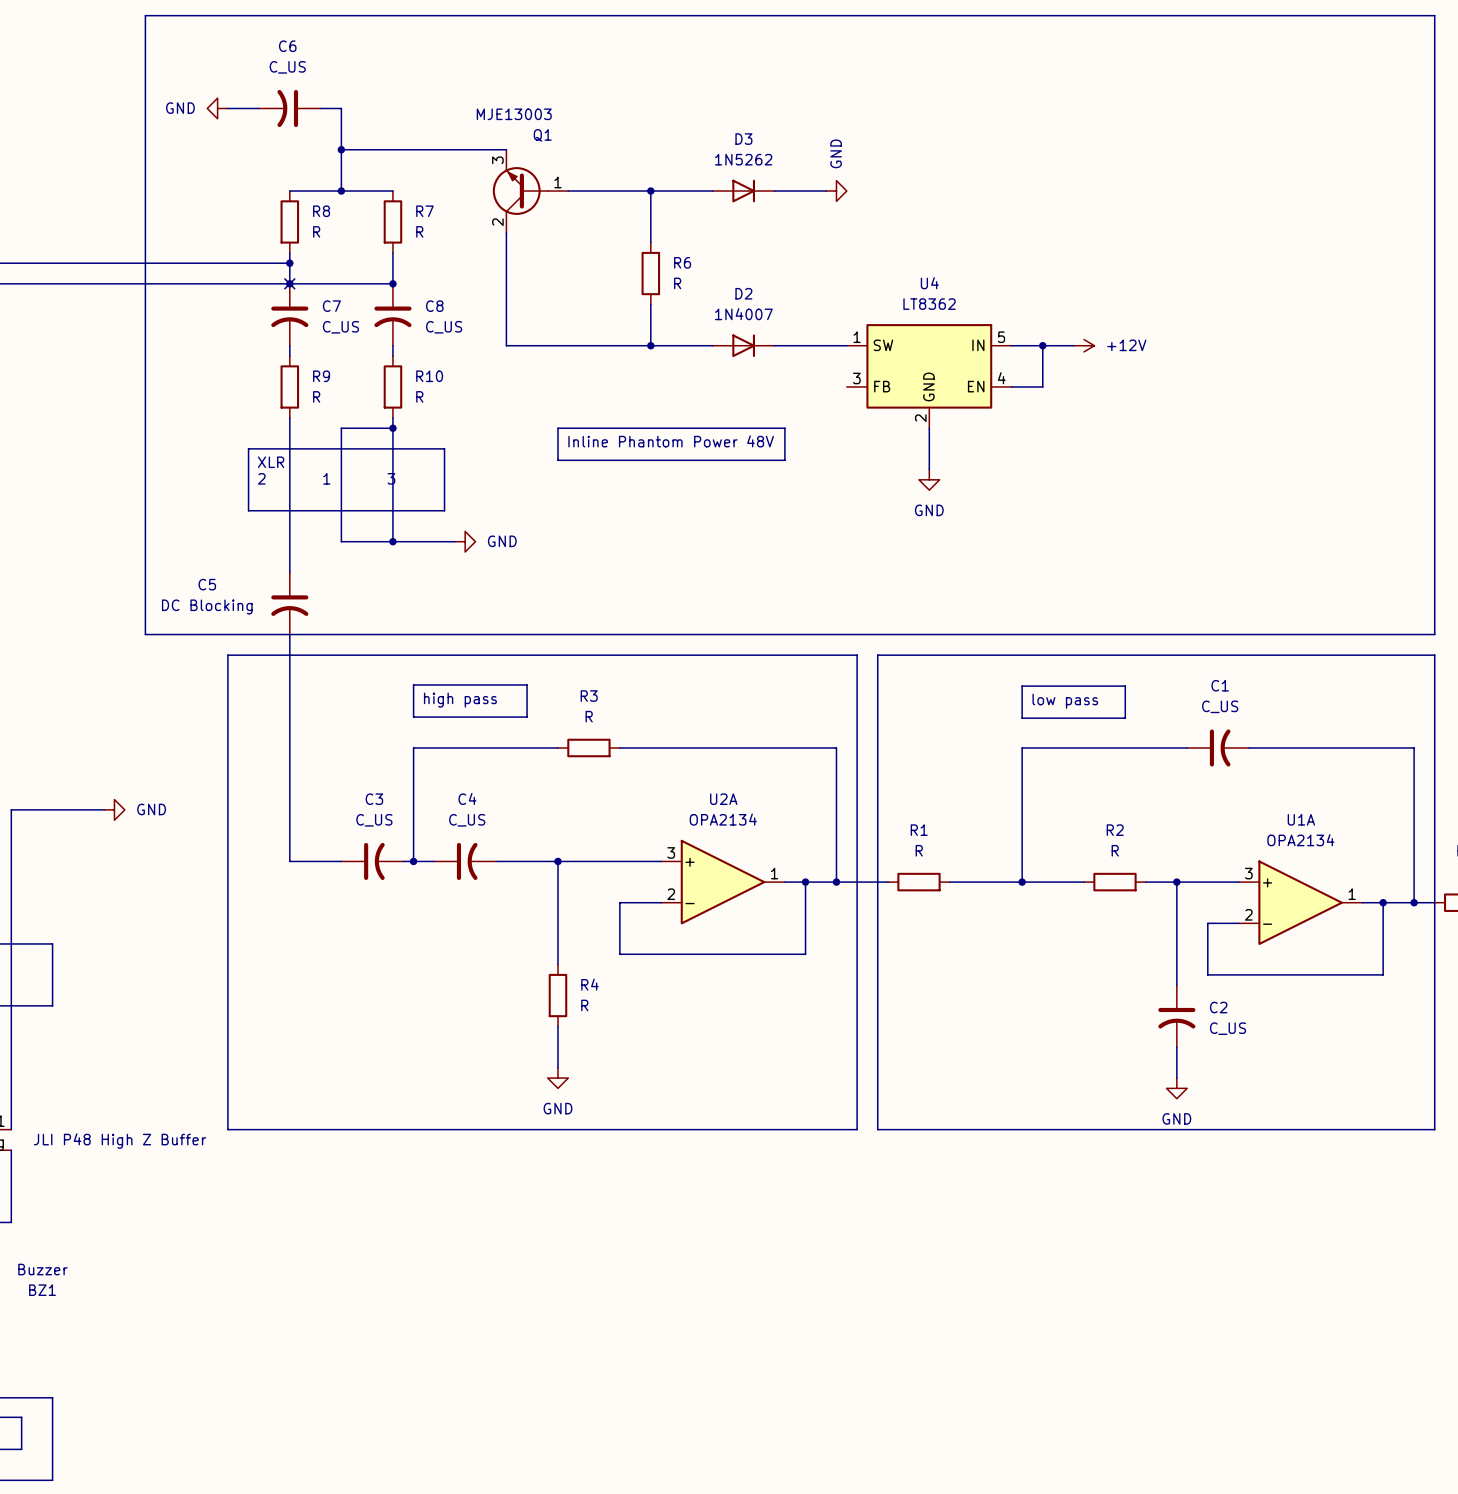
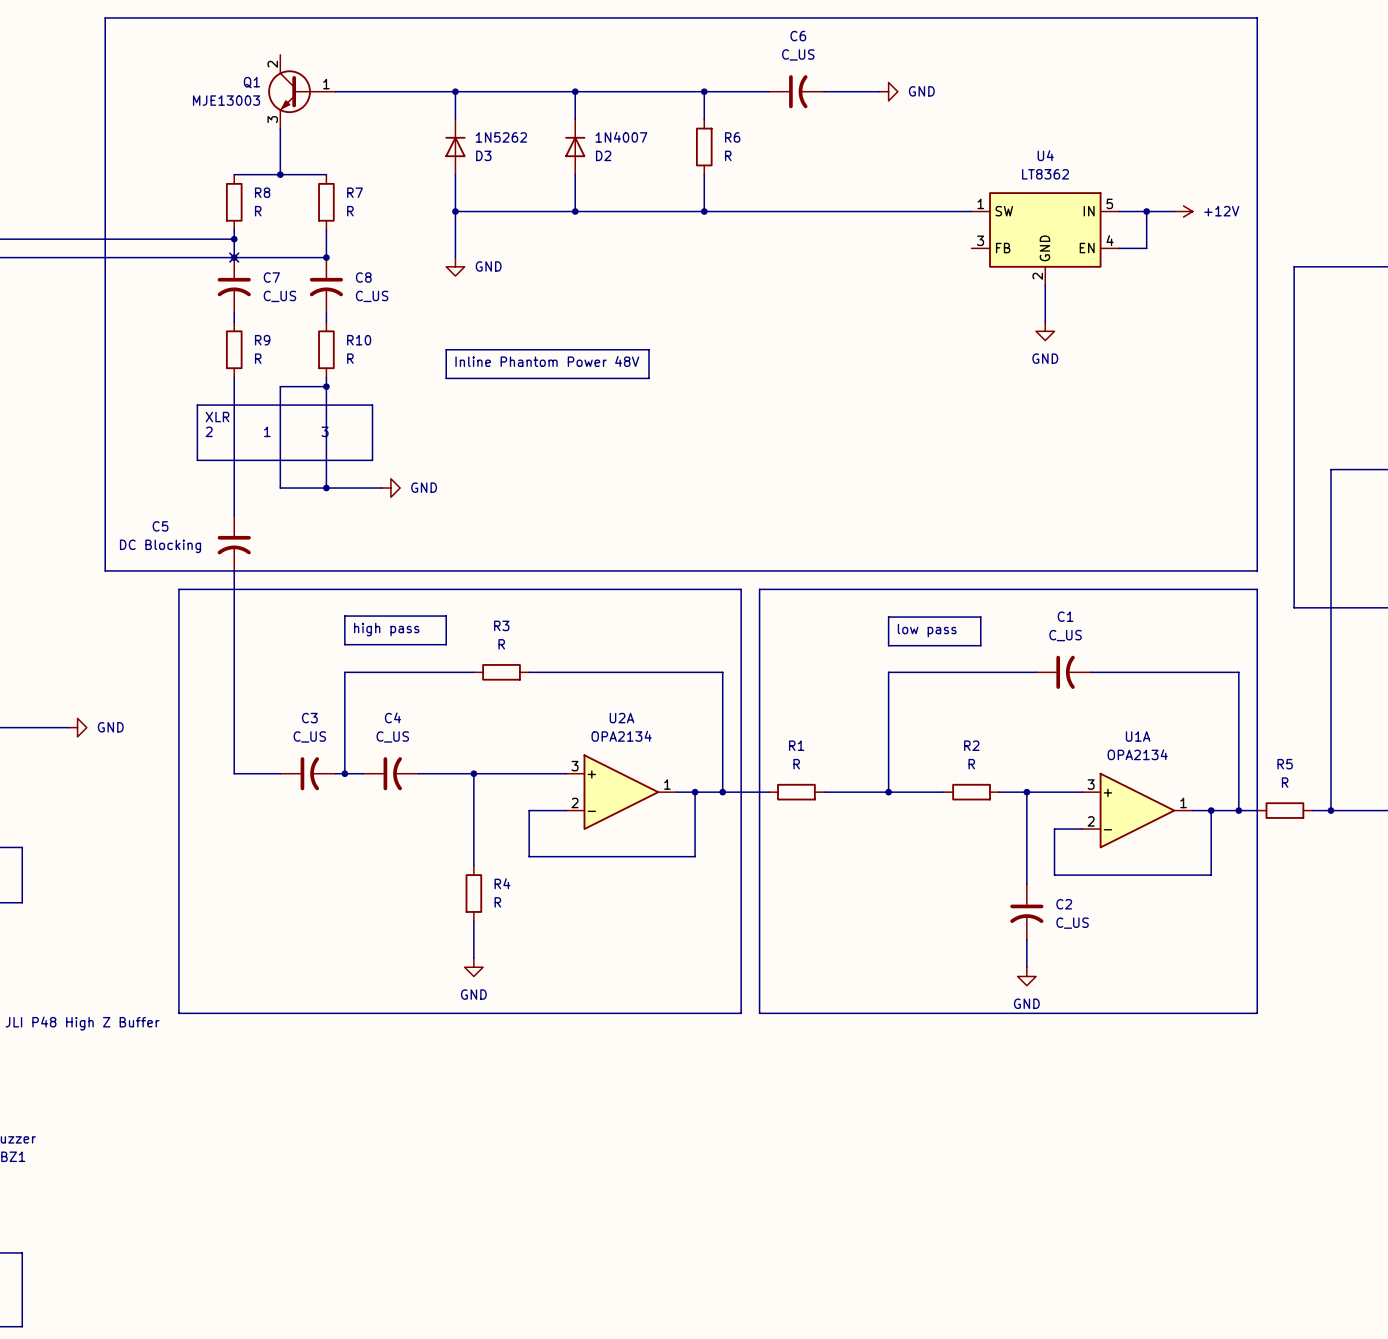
wire: none -> (335, 91) (768, 91)
wire: none -> (455, 91) (455, 119)
junction: none -> (455, 91)
wire: none -> (575, 91) (575, 119)
junction: none -> (575, 91)
wire: none -> (704, 91) (704, 119)
junction: none -> (704, 91)
wire: none -> (824, 91) (879, 91)
power symbol: none -> GND (888, 91)
power symbol: GND (217, 108) -> none
wire: (227, 108) (258, 108) -> none
C6 rotation: 0° (287, 108) -> 180° (798, 91)
C6 position: (289, 108) -> (796, 91)
wire: (320, 108) (341, 108) (341, 139) -> none
Q1 value position: MJE13003 (514, 114) -> MJE13003 (226, 100)
Q1 name position: Q1 (542, 135) -> Q1 (251, 82)
D3 name position: D3 (743, 139) -> D3 (483, 155)
wire: (341, 149) (506, 149) -> none
junction: (341, 149) -> none
D3 value position: 1N5262 (743, 159) -> 1N5262 (501, 137)
Q1 flip: as is (520, 191) -> up-down (292, 91)
Q1 position: (530, 191) -> (301, 91)
wire: none -> (455, 174) (455, 257)
wire: (568, 191) (712, 191) -> none
wire: (650, 191) (650, 242) -> none
junction position: (650, 191) -> (575, 211)
D3 rotation: 0° (743, 191) -> 90° counterclockwise (455, 147)
D3 position: (743, 191) -> (455, 147)
wire: (774, 191) (826, 191) -> none
wire: none -> (704, 174) (704, 211)
power symbol: GND (836, 191) -> none
wire: (506, 232) (506, 345) (712, 345) -> none
wire: none -> (455, 211) (971, 211)
junction: none -> (455, 211)
junction: none -> (704, 211)
wire: none -> (1119, 211) (1174, 211)
wire: none -> (1146, 211) (1146, 248) (1119, 248)
junction: none -> (1146, 211)
power symbol: none -> +12V (1183, 211)
R6 position: (650, 273) -> (704, 147)
D2 name position: D2 (743, 293) -> D2 (603, 155)
power symbol: none -> GND (455, 266)
wire: (650, 304) (650, 345) -> (575, 174) (575, 211)
D2 value position: 1N4007 (743, 314) -> 1N4007 (621, 137)
wire: none -> (1045, 285) (1045, 322)
junction: (650, 345) -> none
D2 rotation: 0° (743, 345) -> 90° counterclockwise (575, 147)
D2 position: (743, 345) -> (575, 147)
wire: (774, 345) (846, 345) -> none
wire: (1011, 345) (1073, 345) -> none
wire: (1042, 345) (1042, 386) (1011, 386) -> none
junction: (1042, 345) -> none
power symbol: +12V (1084, 345) -> none
power symbol: none -> GND (1045, 331)
U4 position: (929, 376) -> (1045, 238)
line: (557, 428) (784, 428) (784, 460) (557, 460) (557, 428) -> (446, 349) (648, 349) (648, 378) (446, 378) (446, 349)
wire: (929, 428) (929, 469) -> none
text position: Inline Phantom Power 48V (671, 441) -> Inline Phantom Power 48V (547, 361)
power symbol: GND (929, 479) -> none

